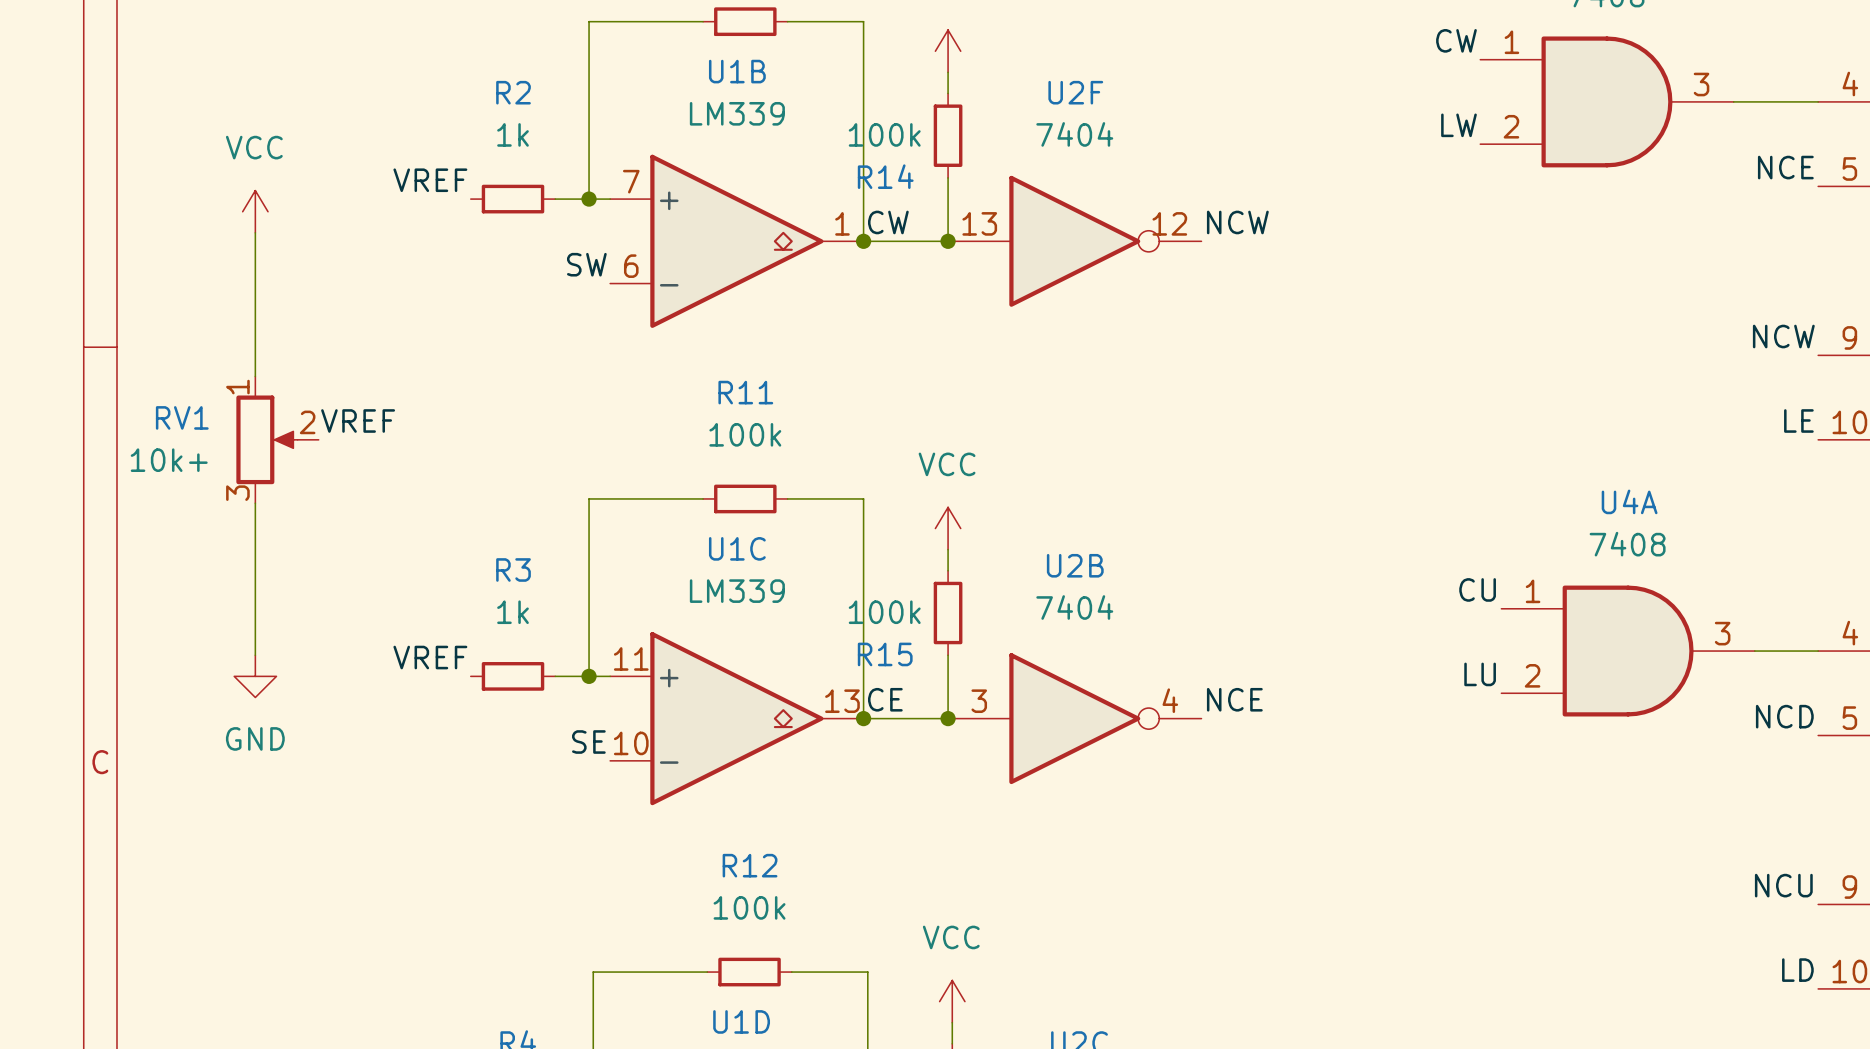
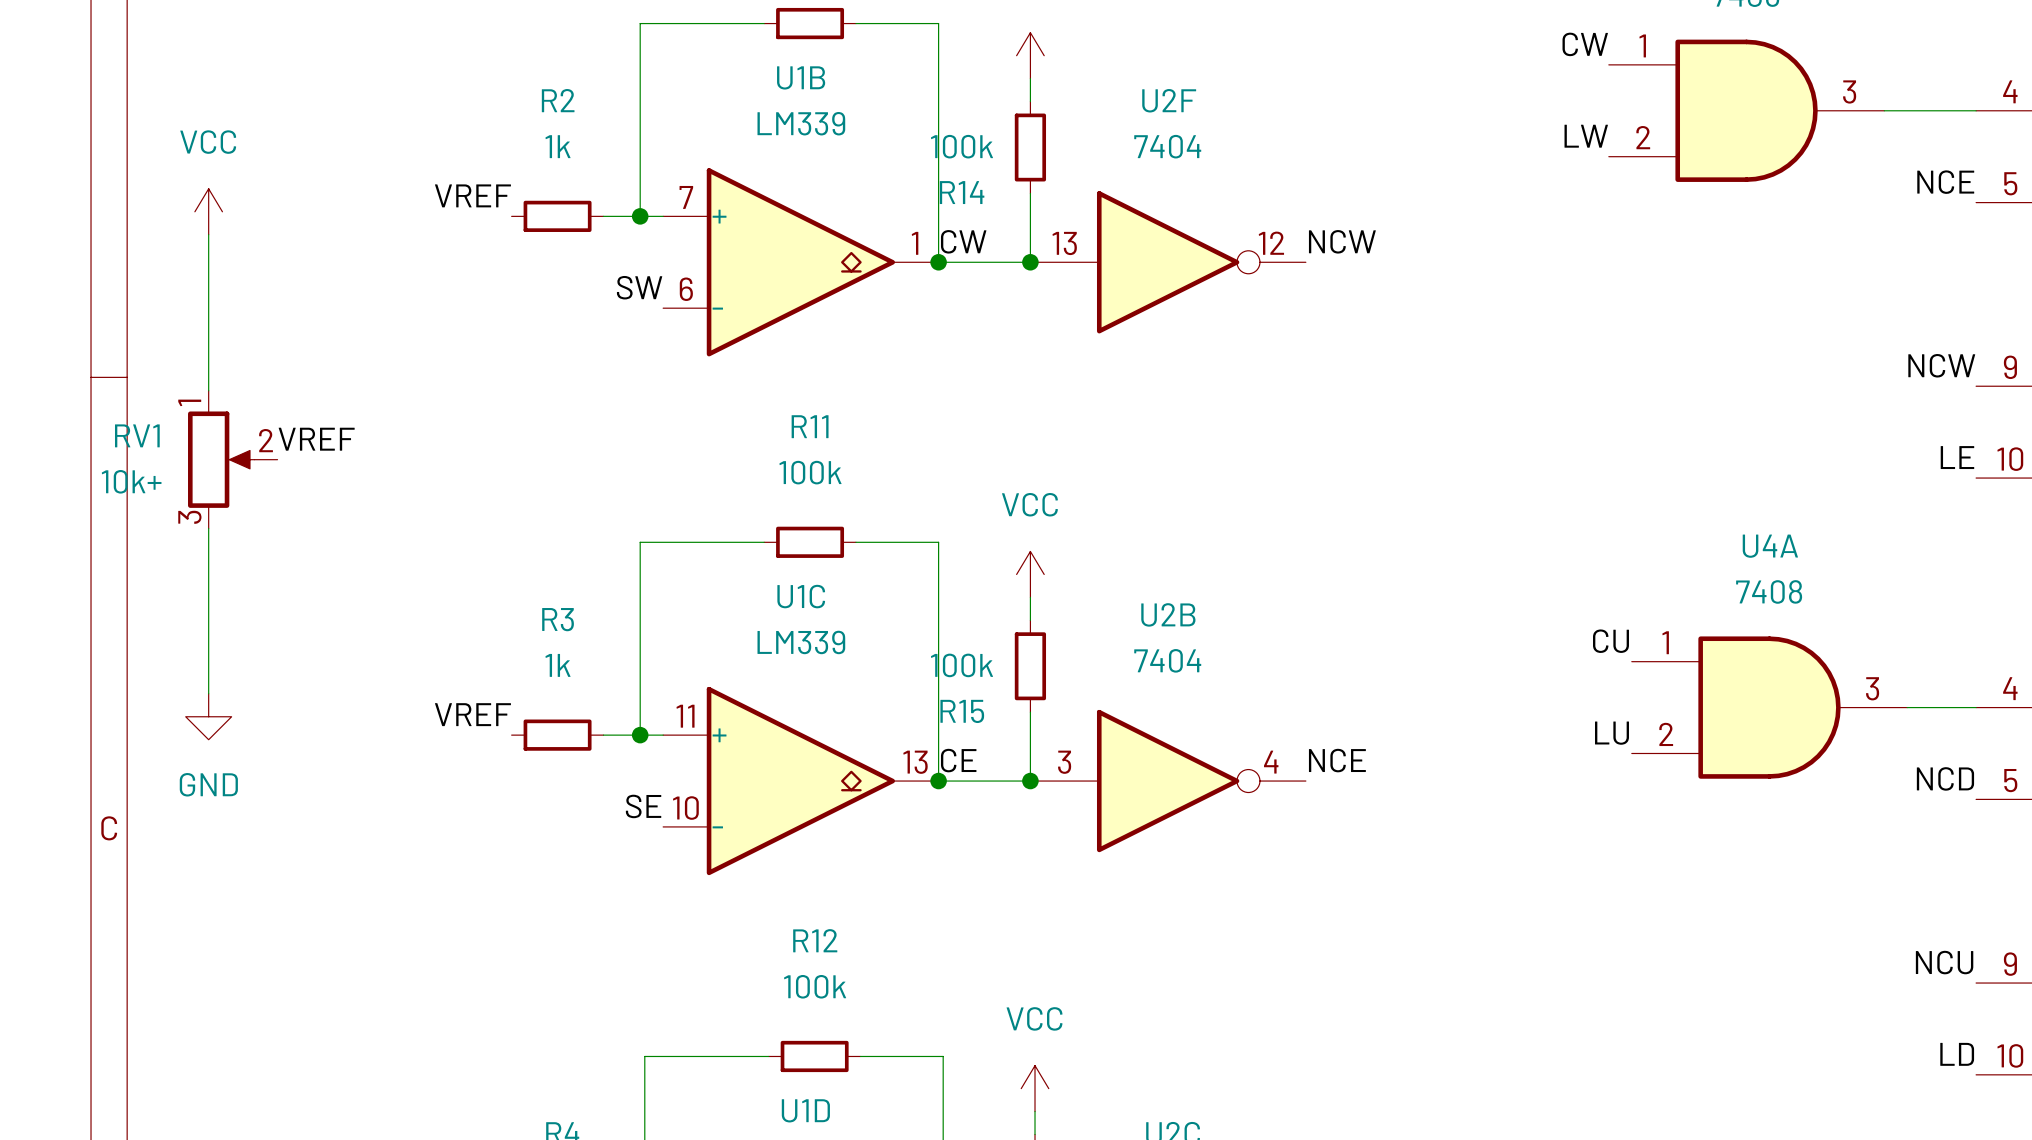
power symbol position: VCC (255, 211) -> VCC (208, 211)
wire: (255, 232) (255, 376) -> (208, 234) (208, 390)
label position: VREF (358, 420) -> VREF (316, 439)
RV1 position: (277, 439) -> (232, 459)
wire: (255, 503) (255, 655) -> (208, 528) (208, 693)
power symbol position: GND (255, 676) -> GND (208, 716)

